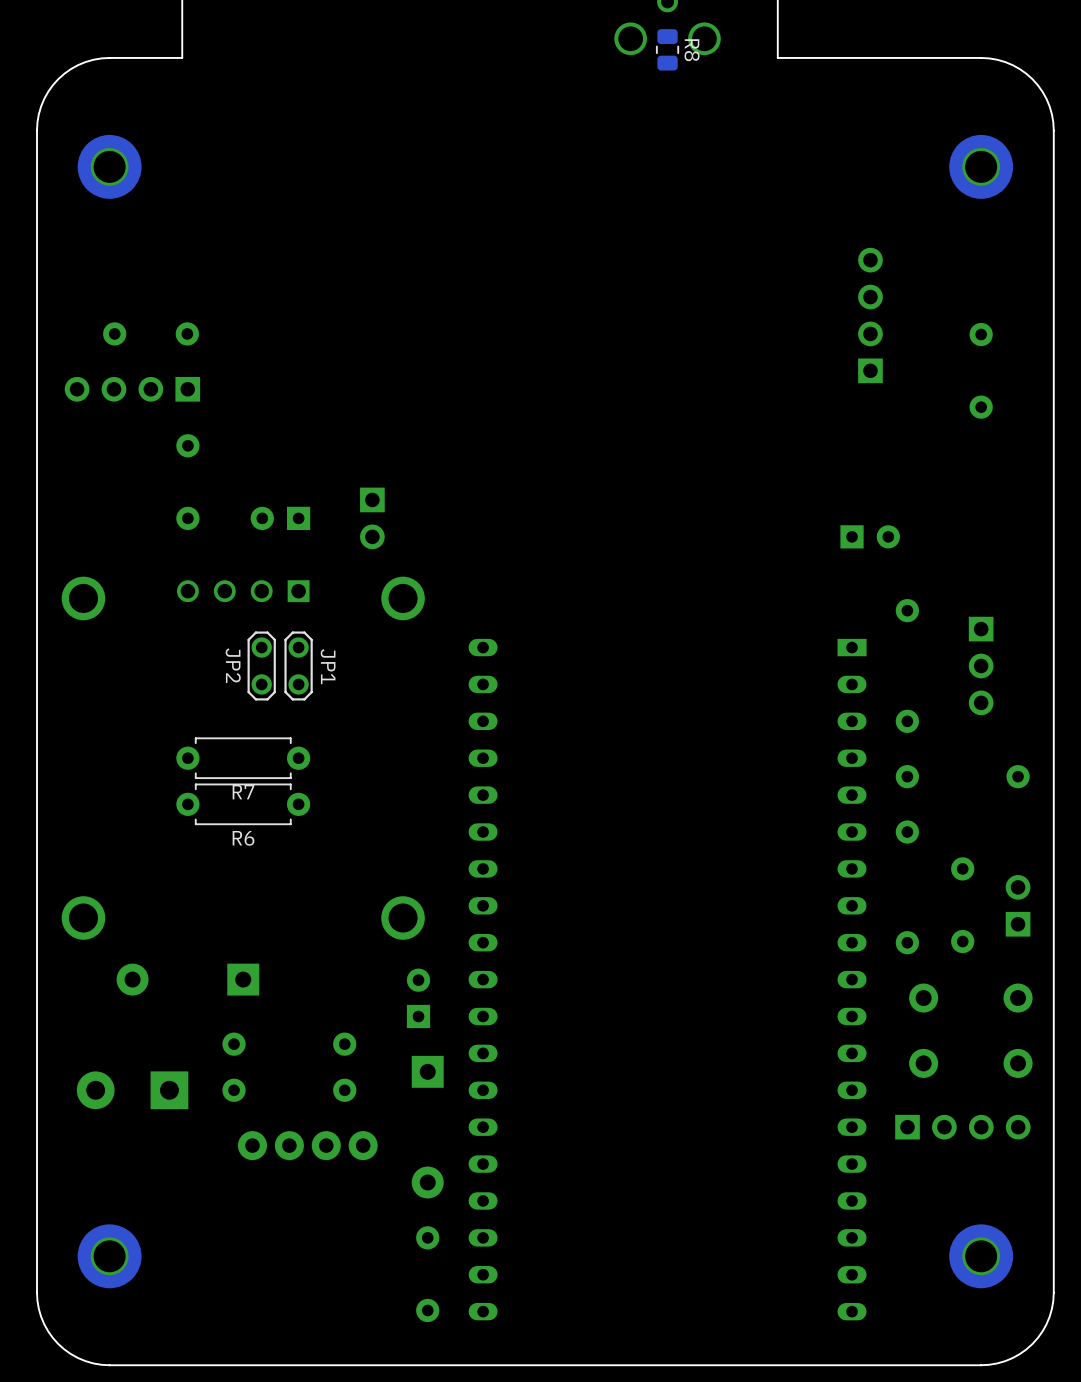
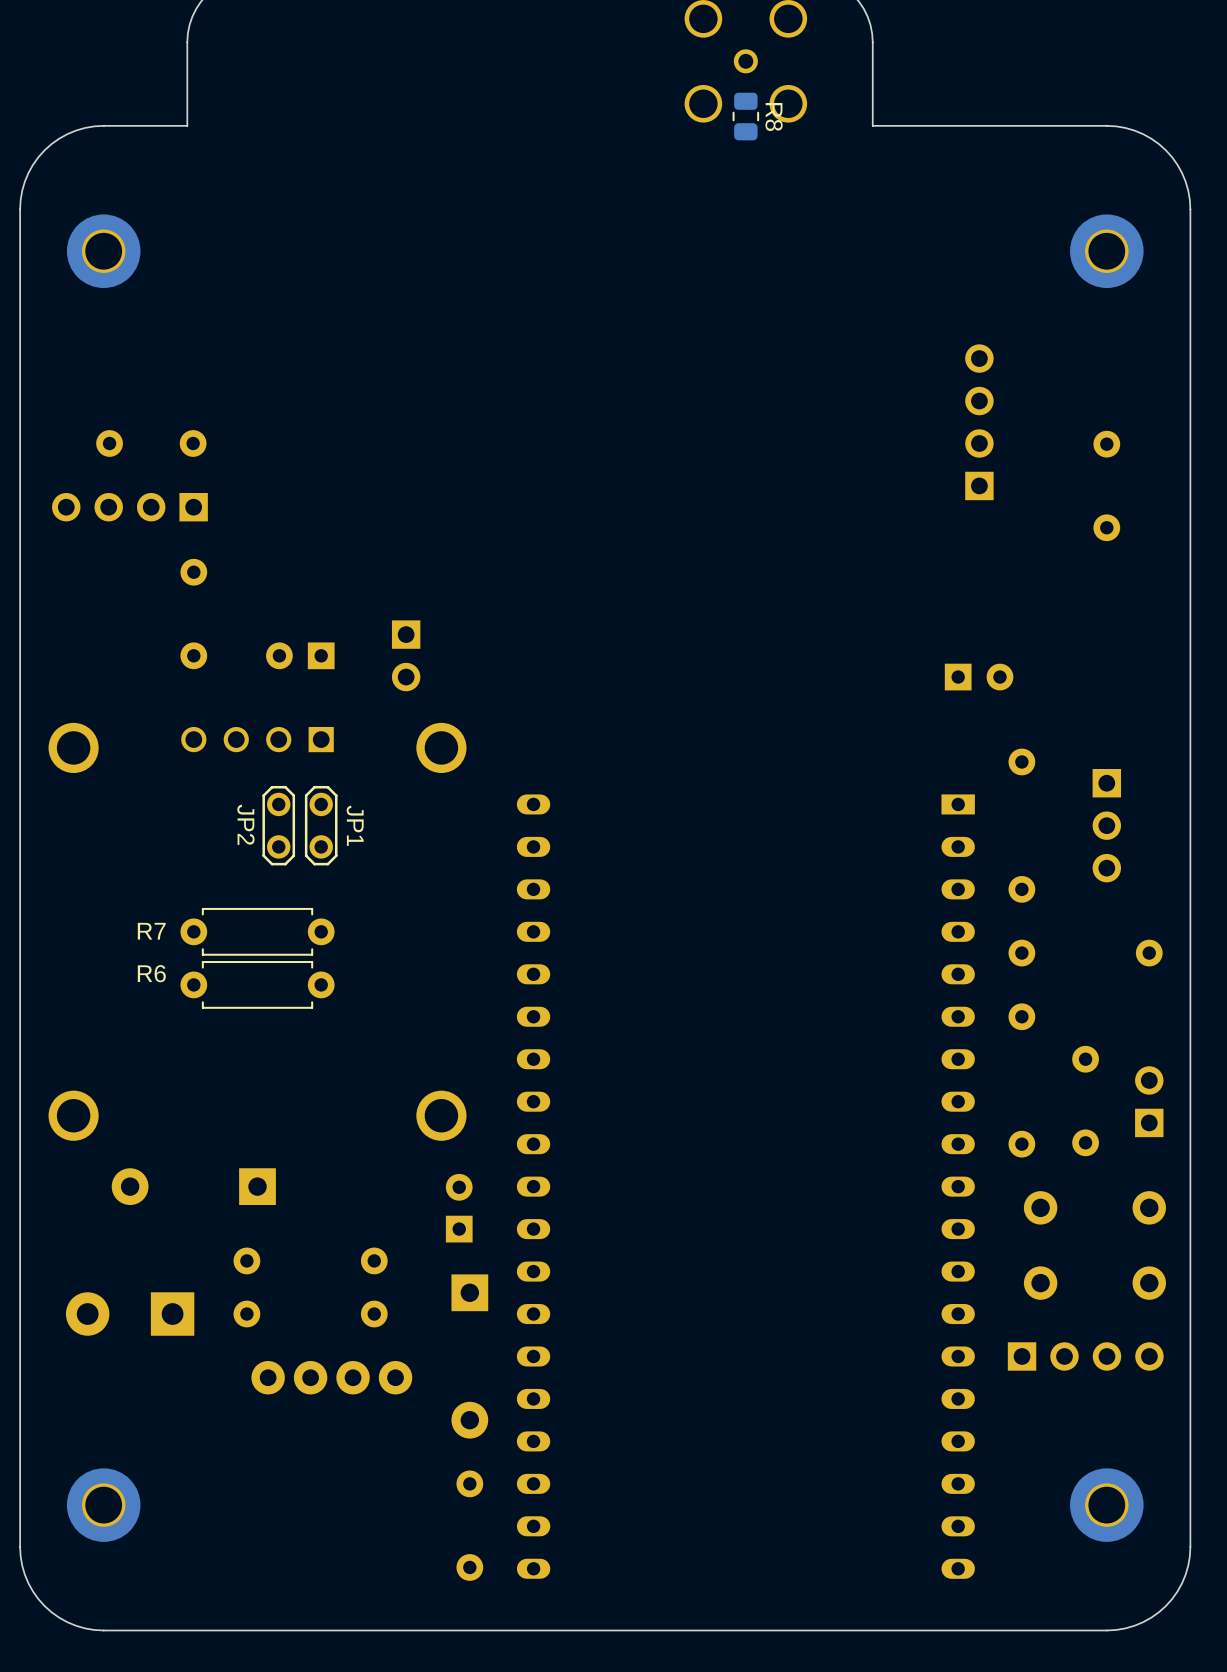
R7 name position: R7 (243, 792) -> R7 (151, 931)
R6 name position: R6 (243, 838) -> R6 (151, 973)

